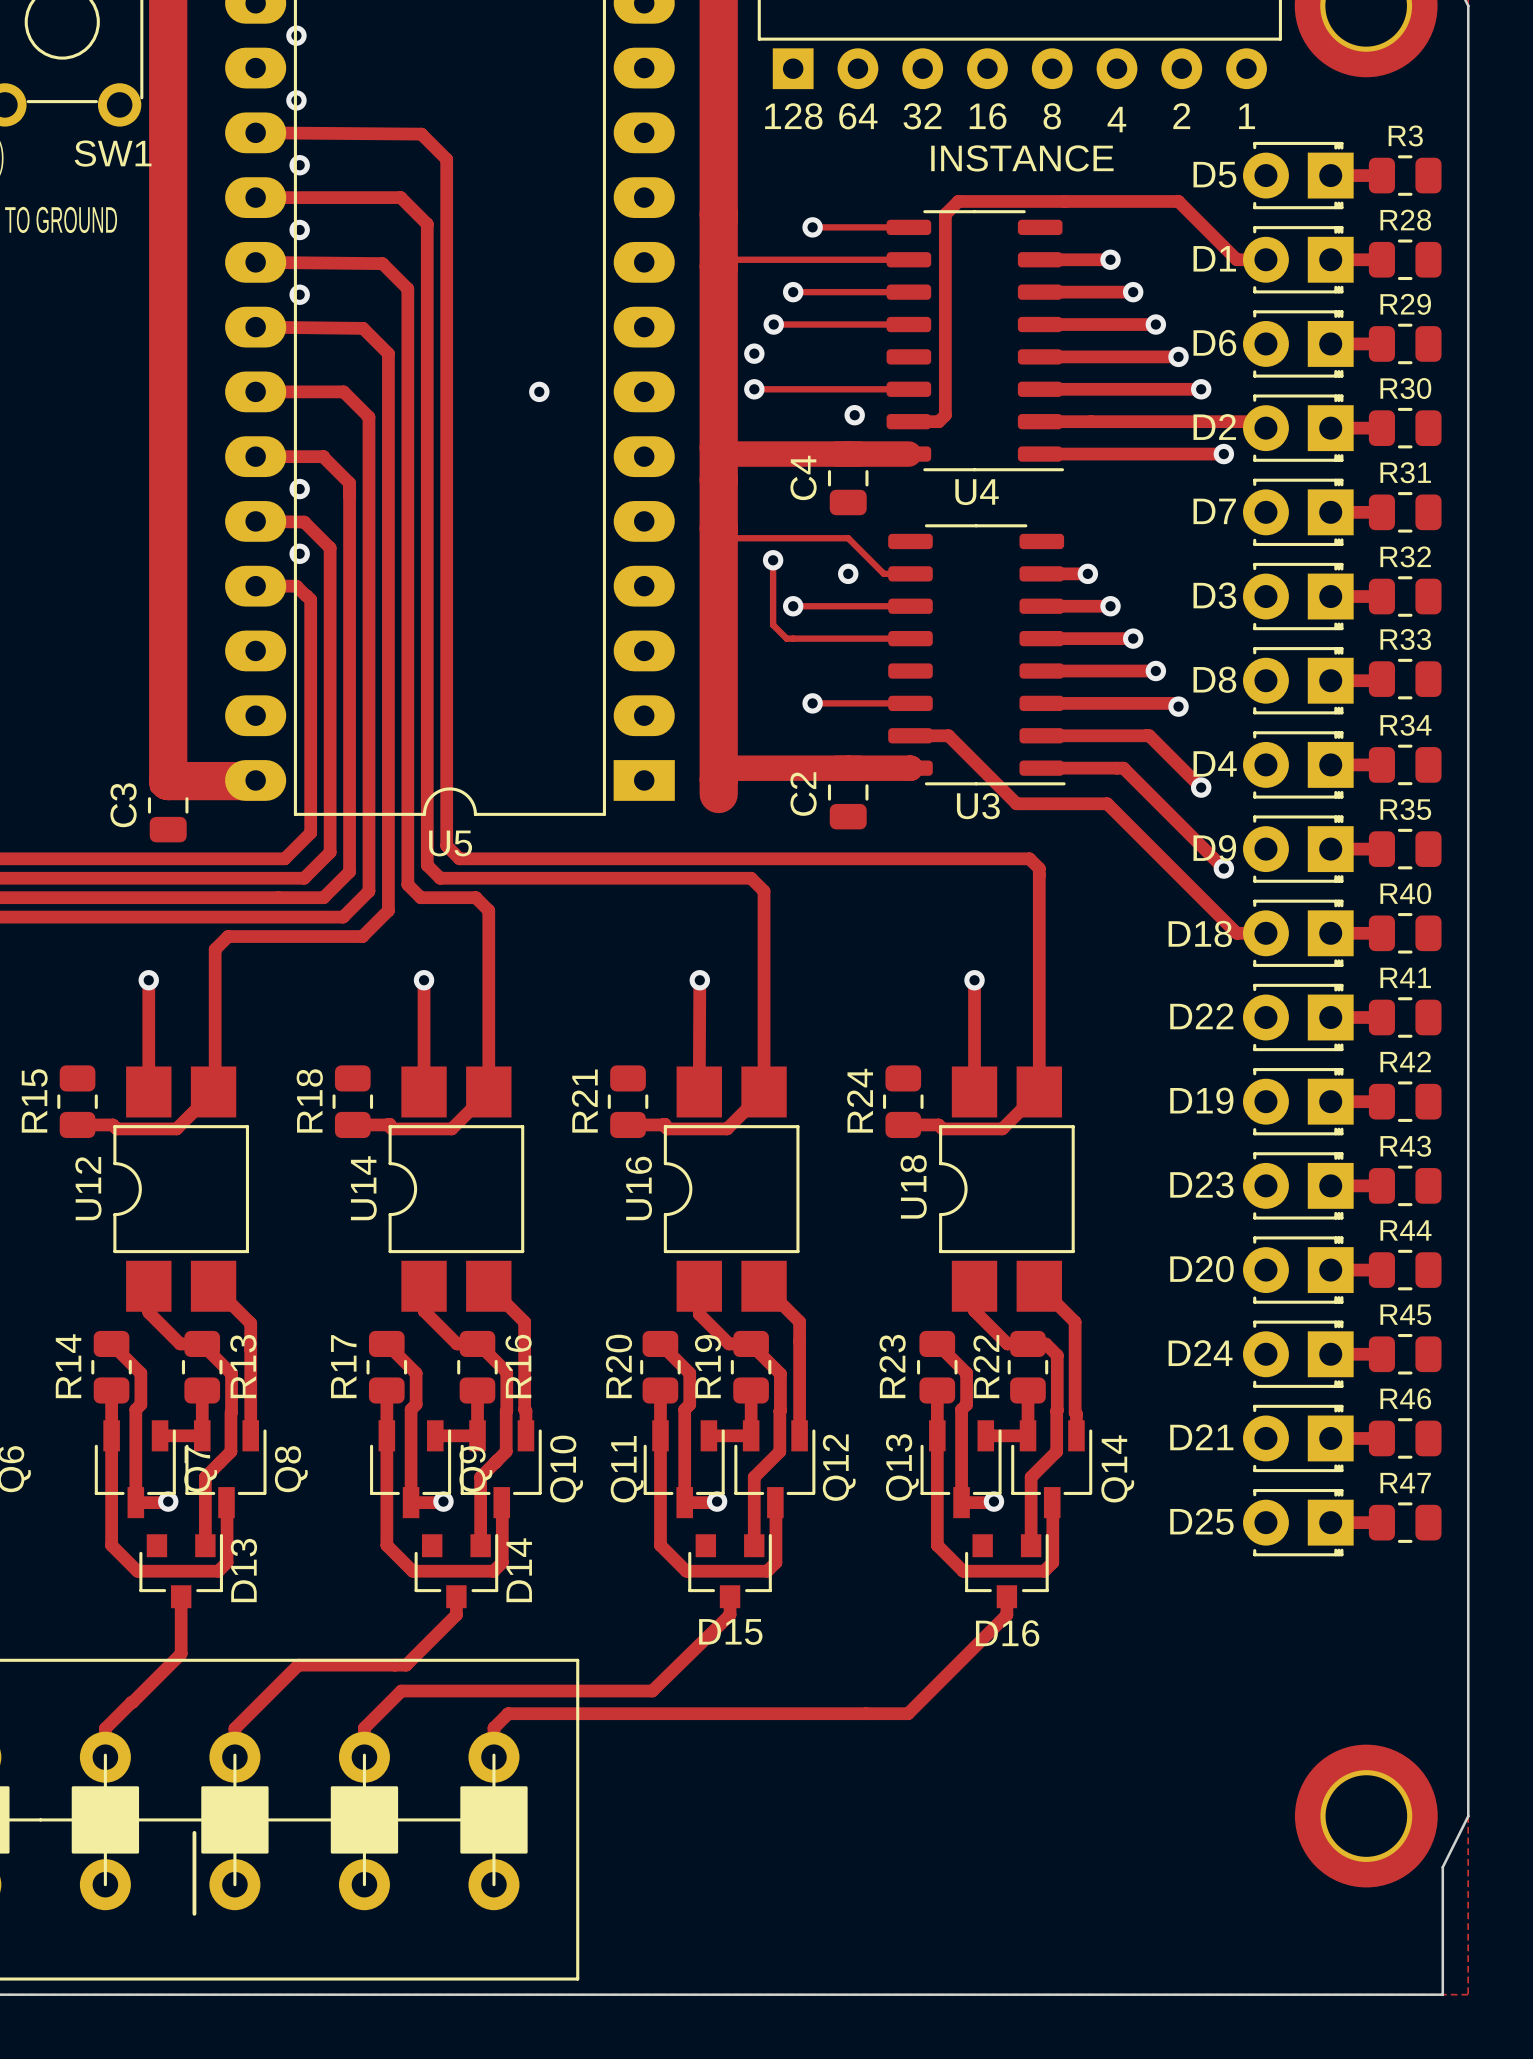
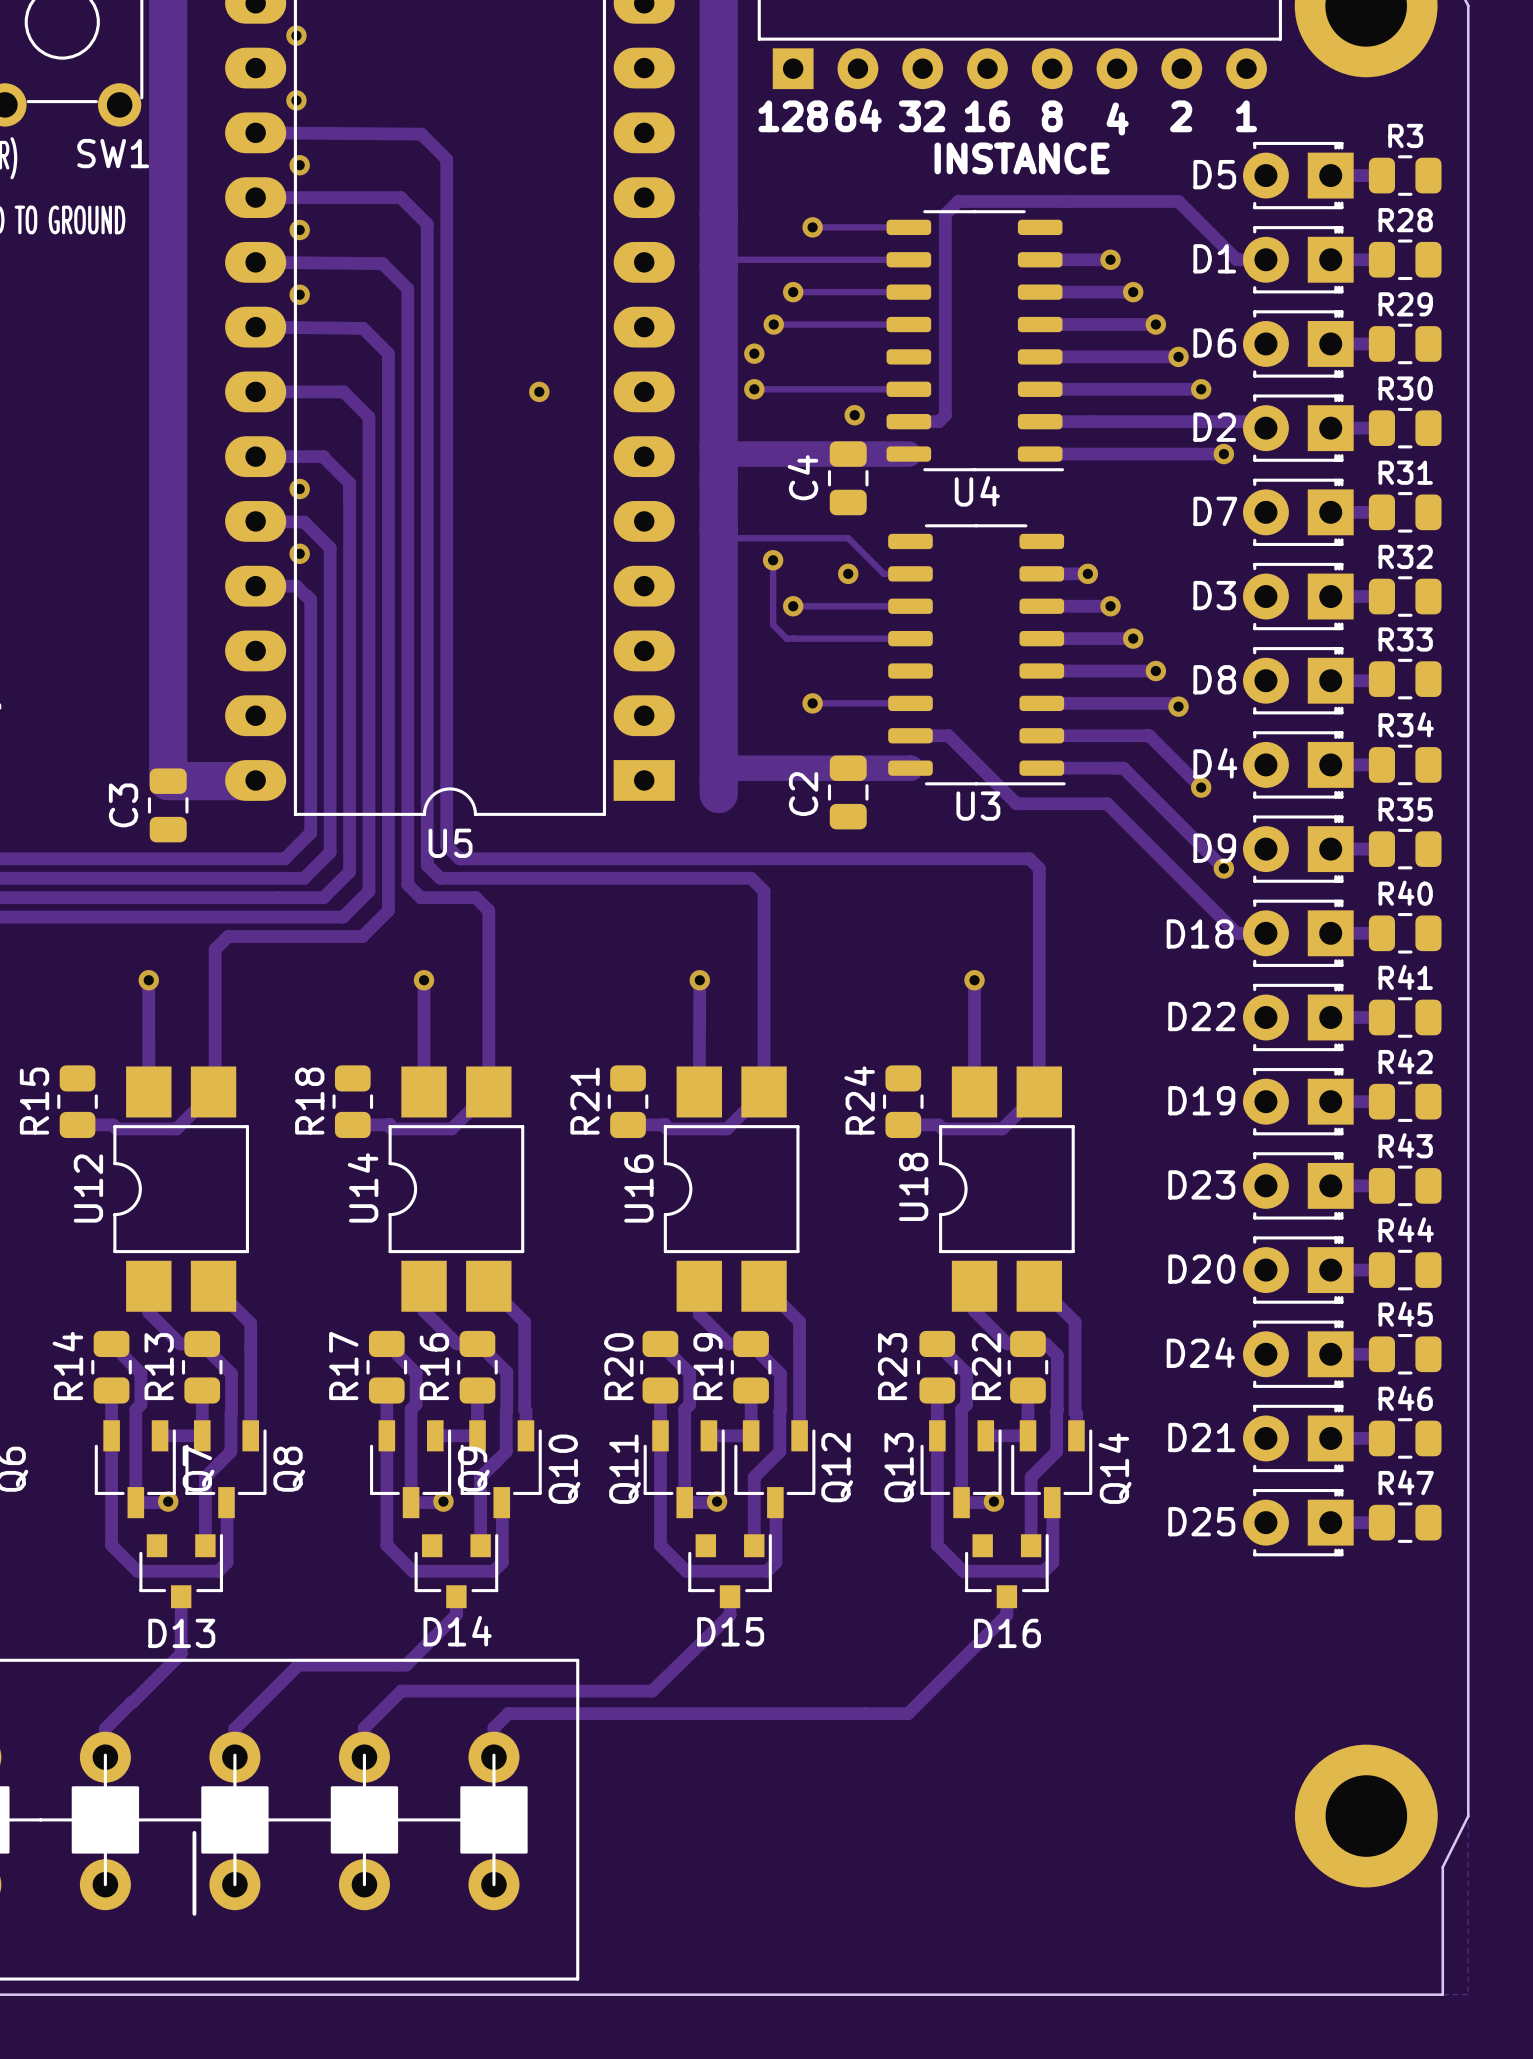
R13 name position: R13 (243, 1366) -> R13 (159, 1366)
R16 name position: R16 (518, 1366) -> R16 (434, 1366)
D13 name rotation: 0° (243, 1570) -> 90° clockwise (181, 1633)
D13 name position: D13 (243, 1570) -> D13 (181, 1633)
D14 name rotation: 0° (519, 1570) -> 90° clockwise (457, 1631)

